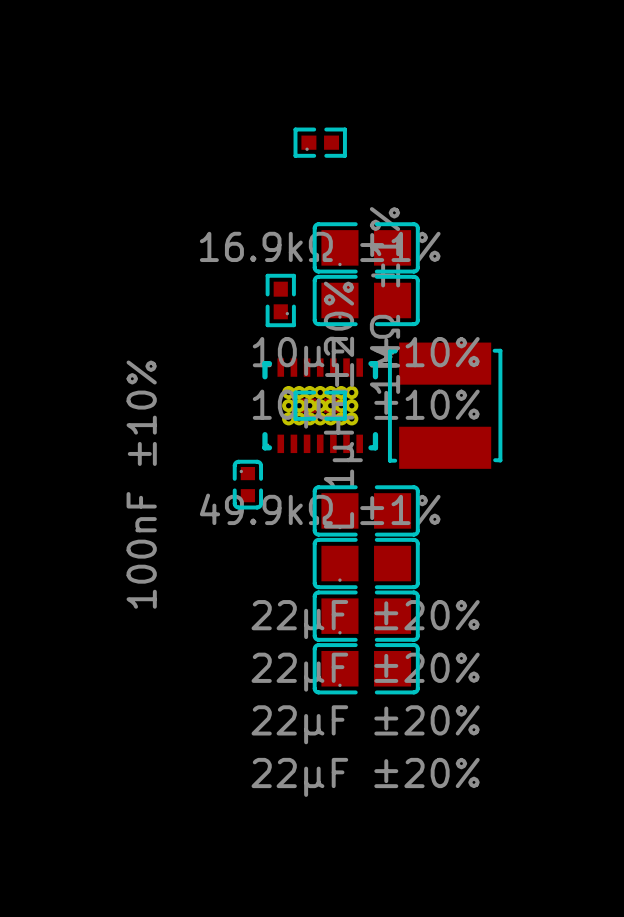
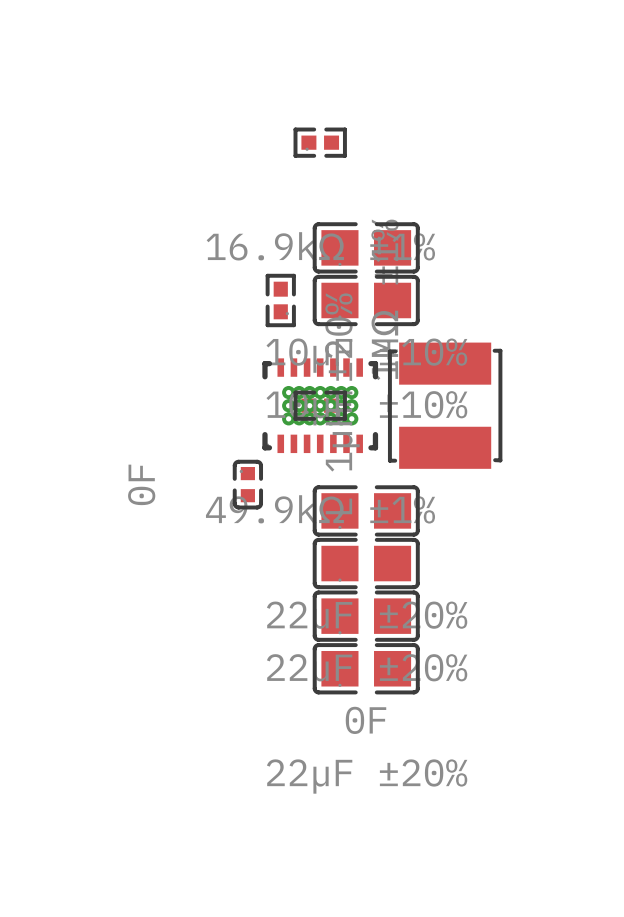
part value: 100nF ±10% (141, 484) -> 0F (141, 484)
part value: 22µF ±20% (365, 724) -> 0F (365, 720)

